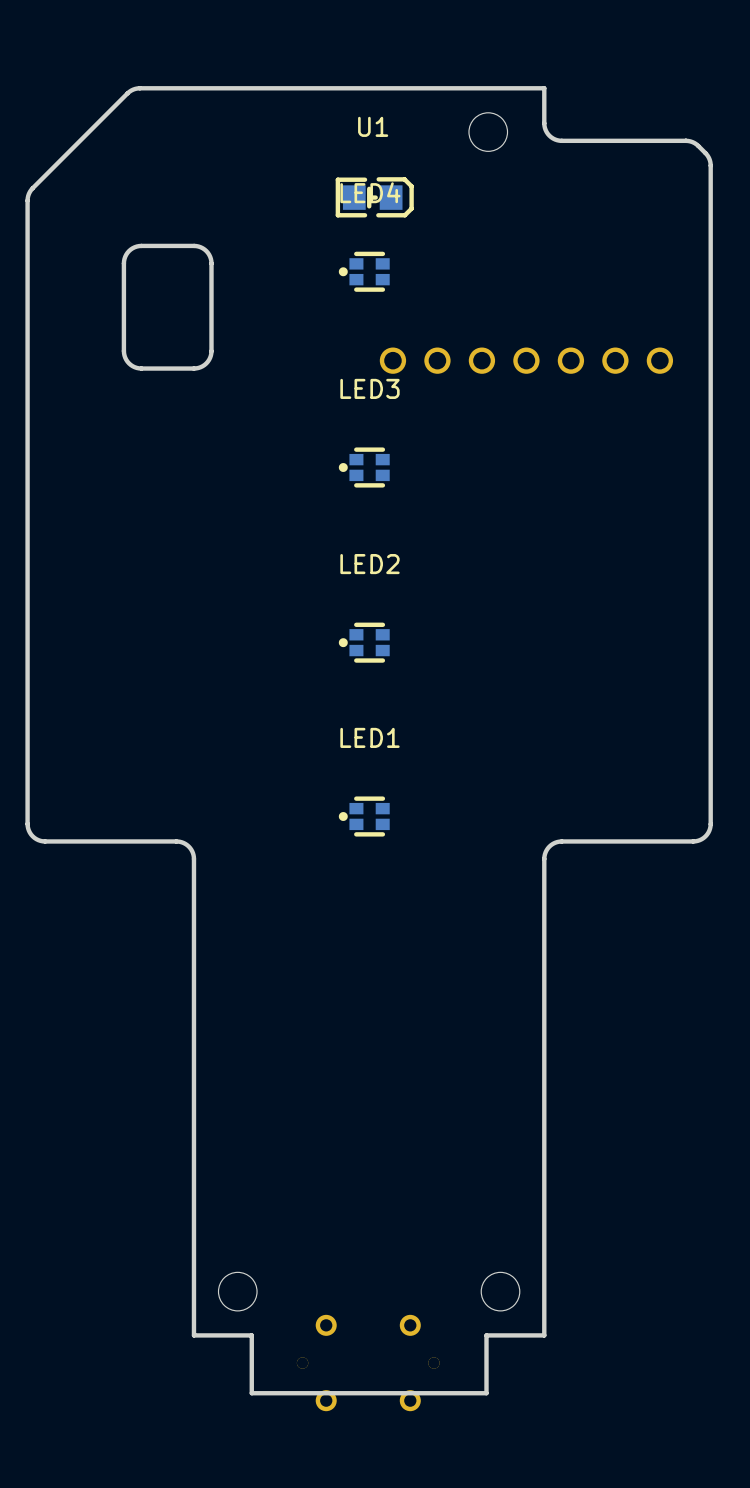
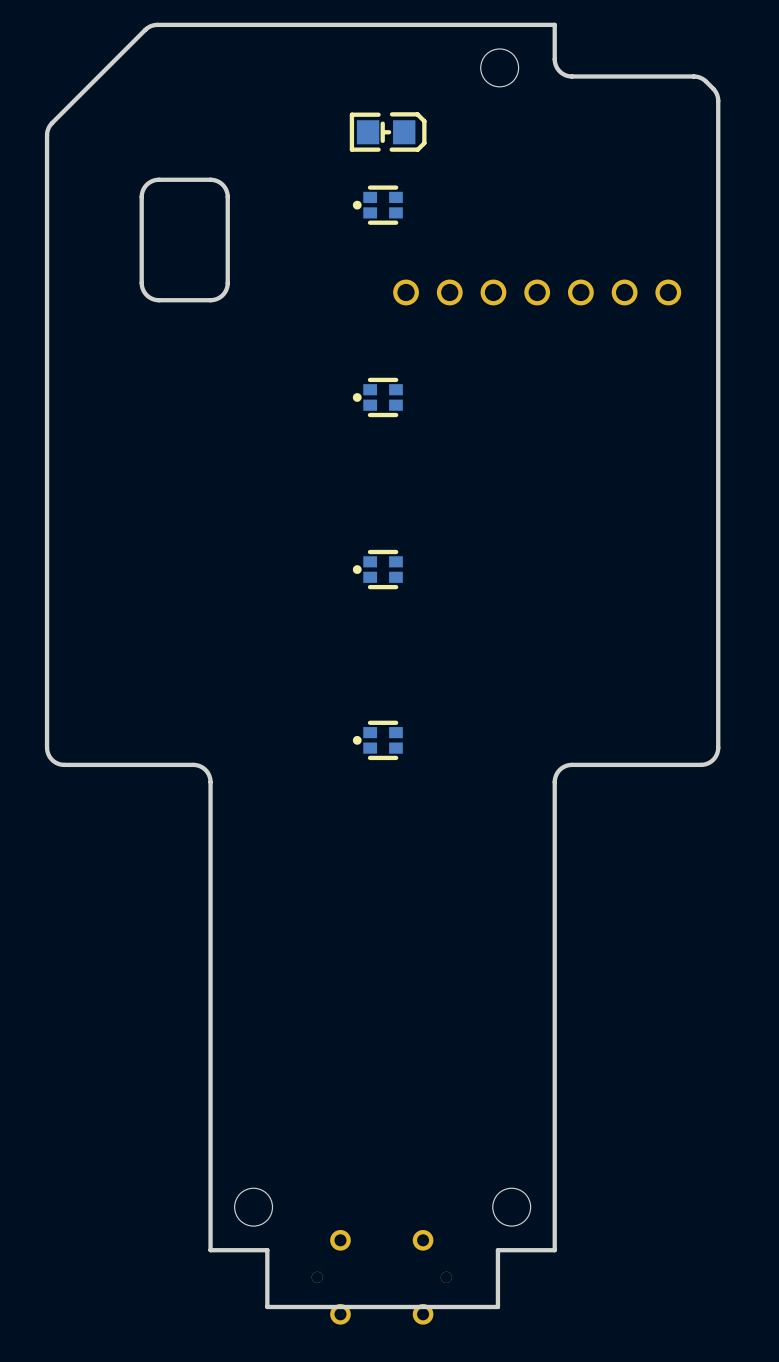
U1 name: U1 (373, 126) -> none
LED4 name: LED4 (370, 192) -> none
LED3 name: LED3 (369, 388) -> none
LED2 name: LED2 (369, 564) -> none
LED1 name: LED1 (369, 737) -> none

